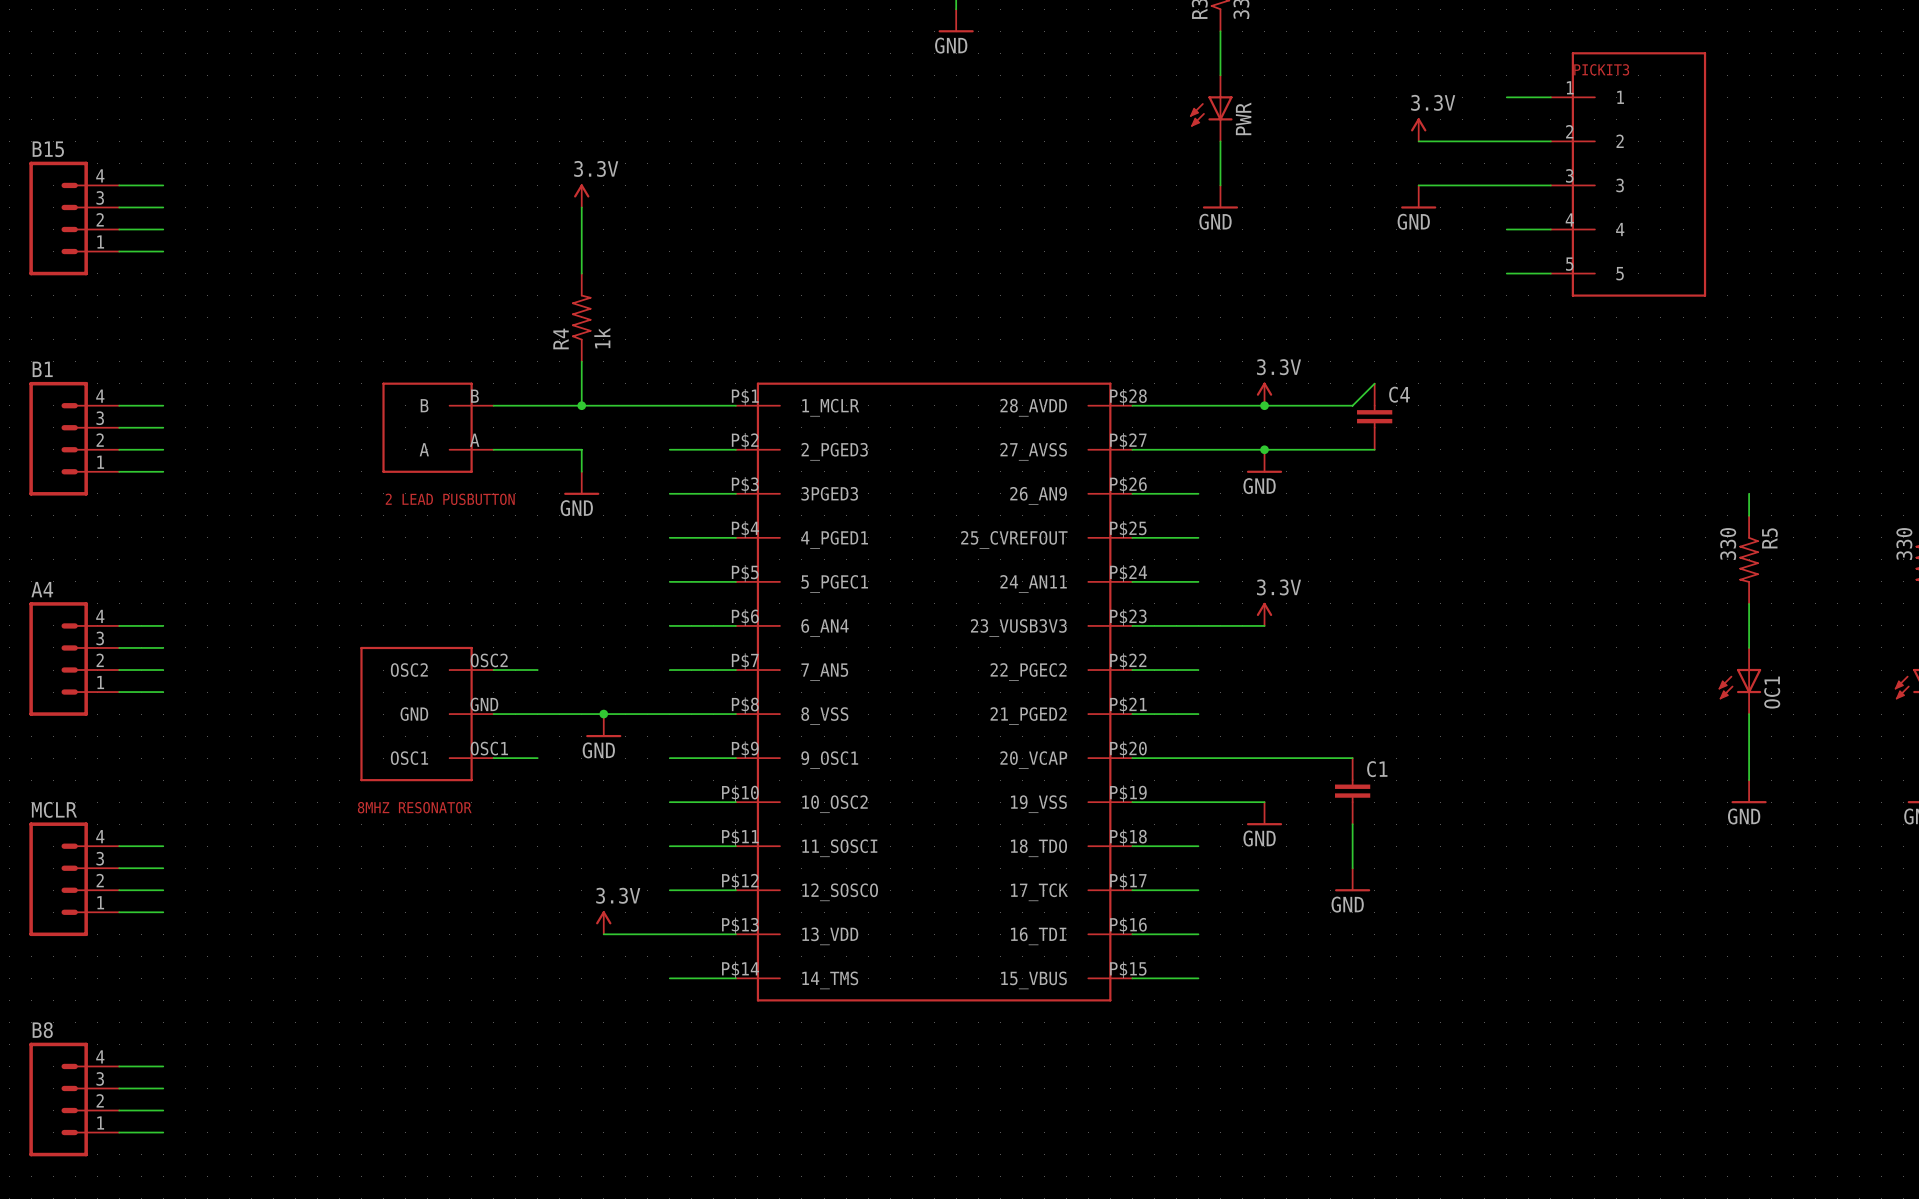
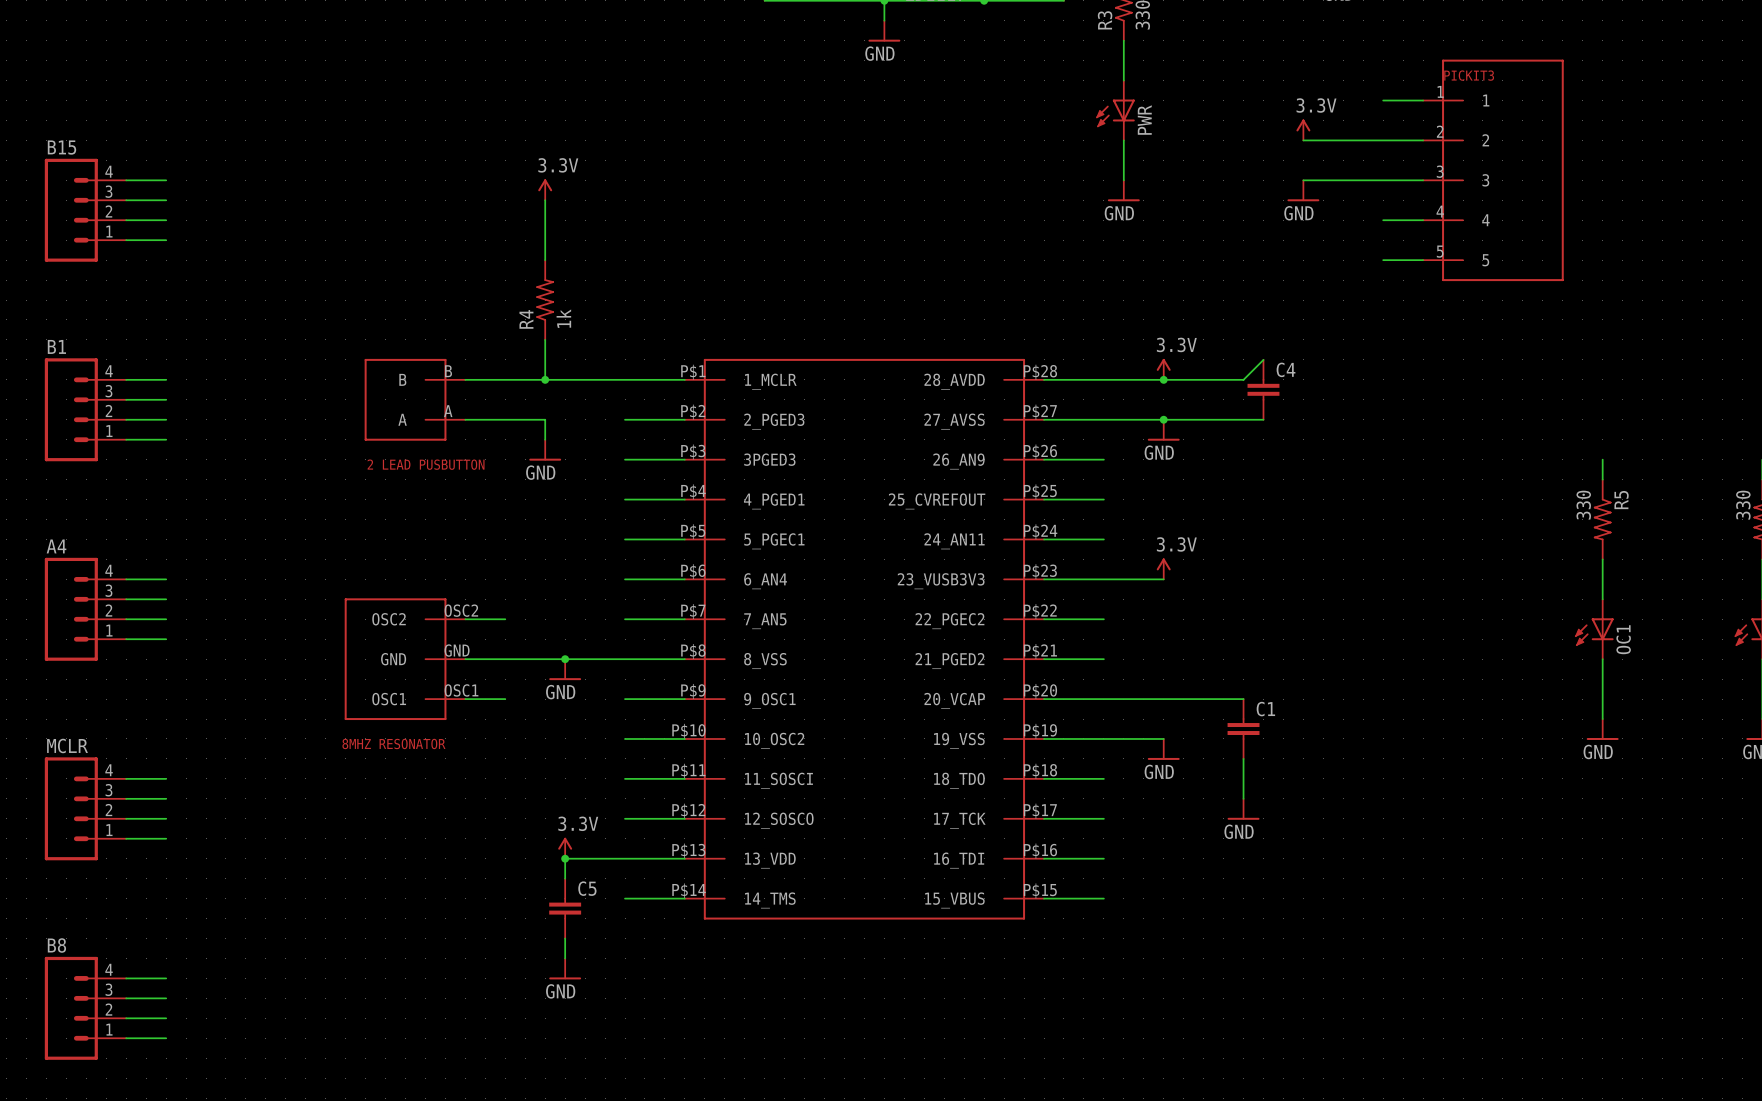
wire: none -> (565, 858) (565, 878)
junction: none -> (565, 858)
C5: none -> (565, 908)
wire: none -> (565, 938) (565, 958)
power symbol: none -> GND (565, 968)

